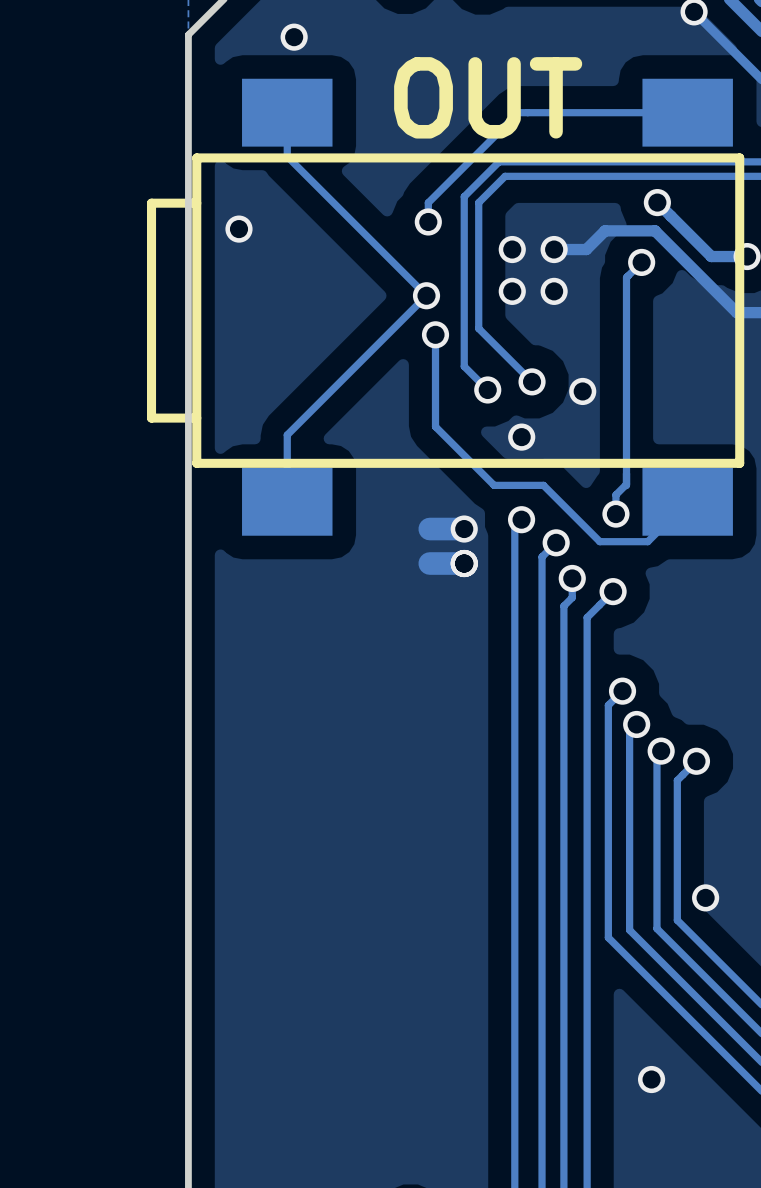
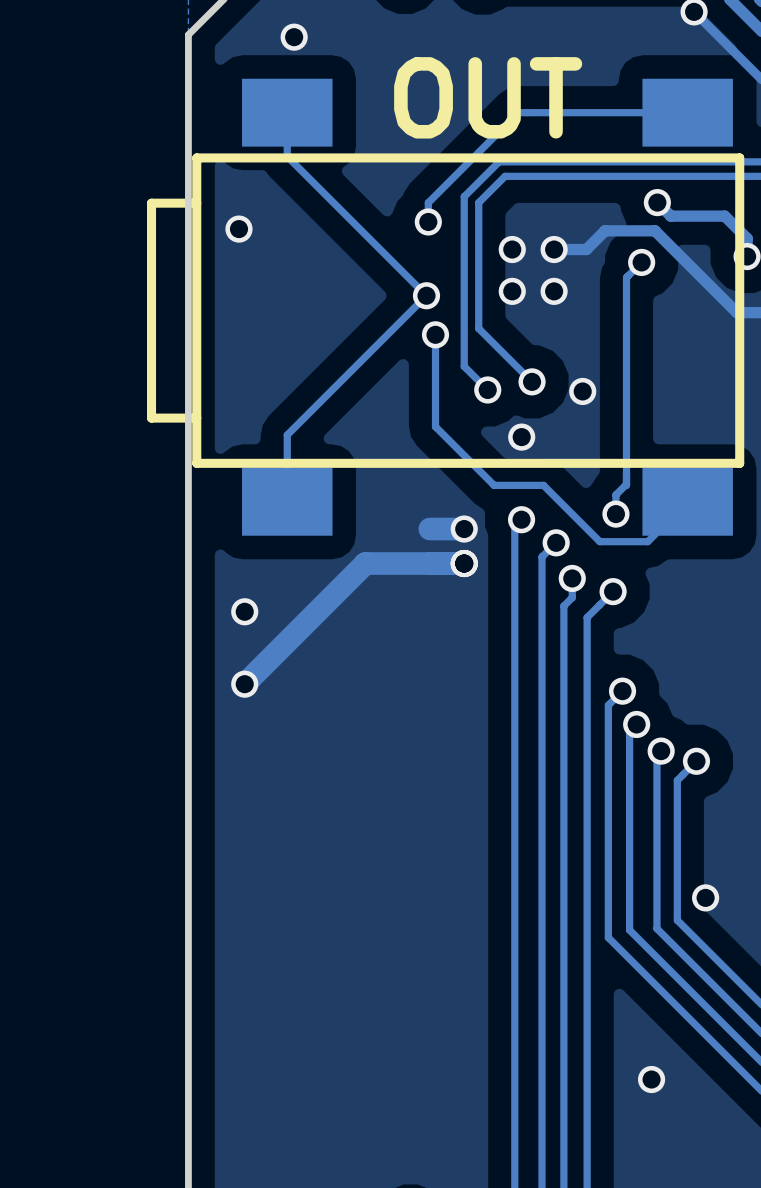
track: (670, 216) (711, 256) (747, 256) -> (670, 216) (724, 216) (747, 238) (747, 256)
track: none -> (429, 563) (365, 563) (244, 684)
via: none -> (244, 611)
via: none -> (244, 684)

